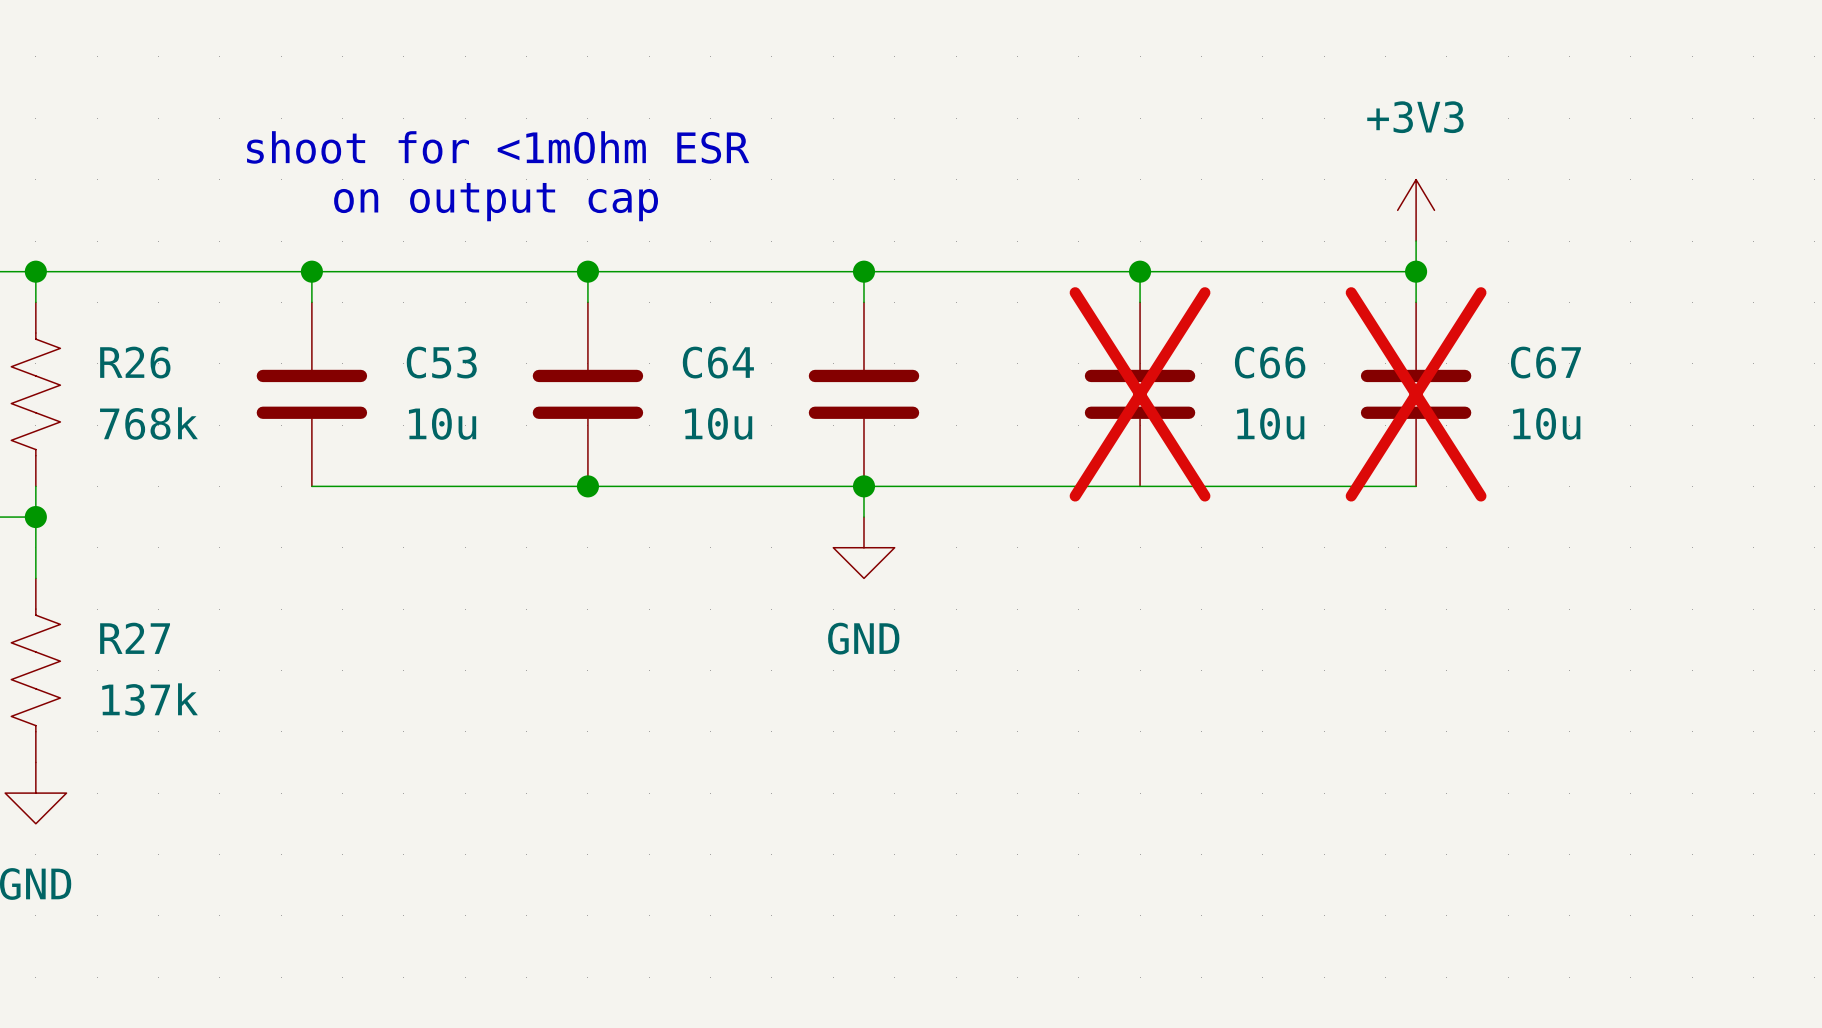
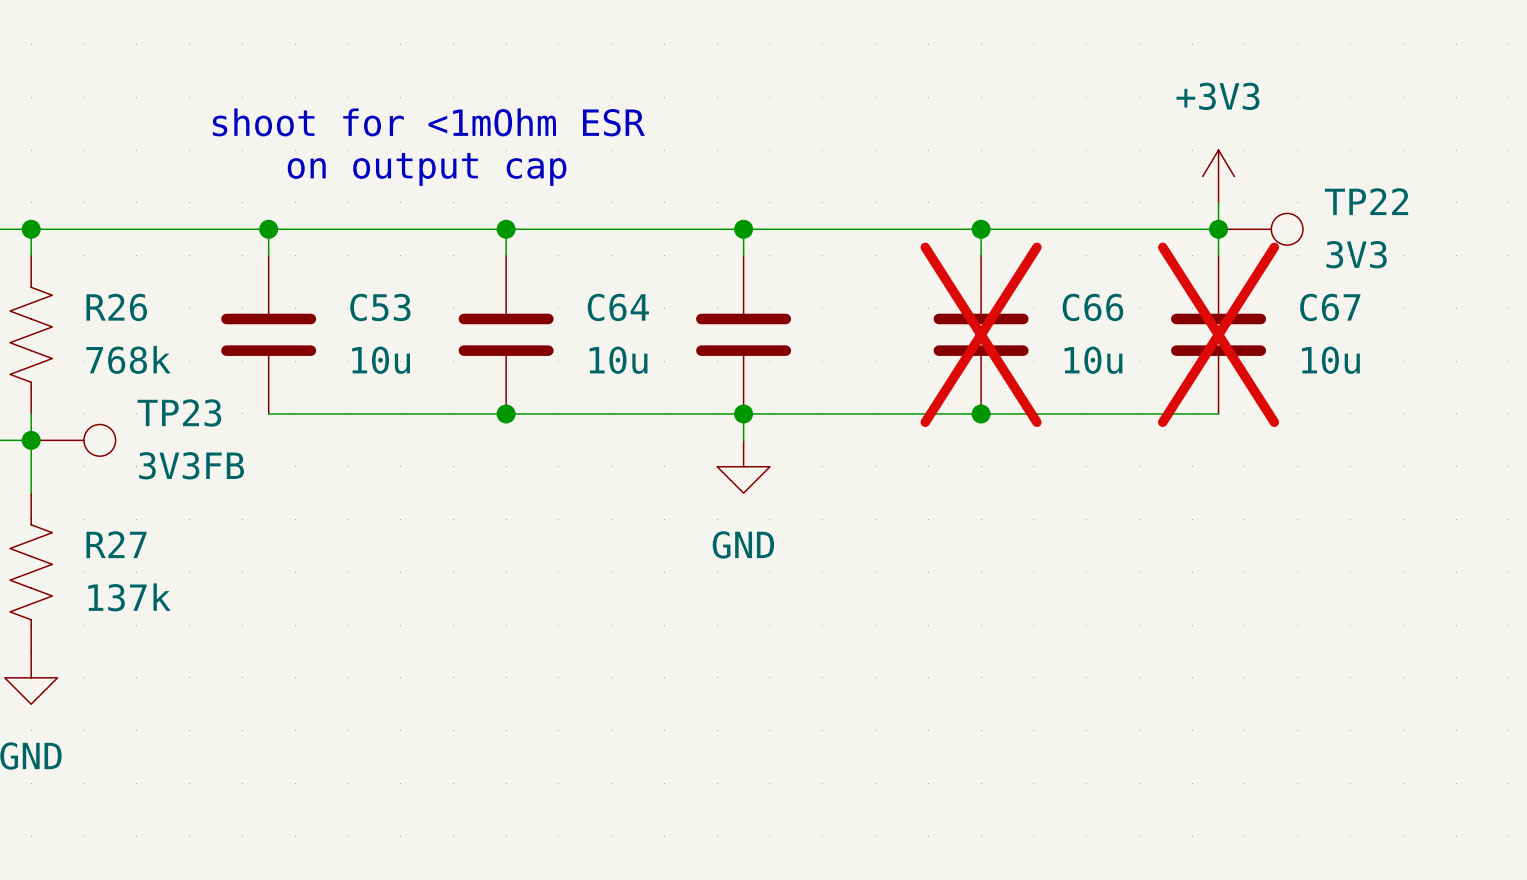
TP22: none -> 3V3 (1260, 229)
junction: none -> (981, 413)
TP23: none -> 3V3FB (73, 440)

